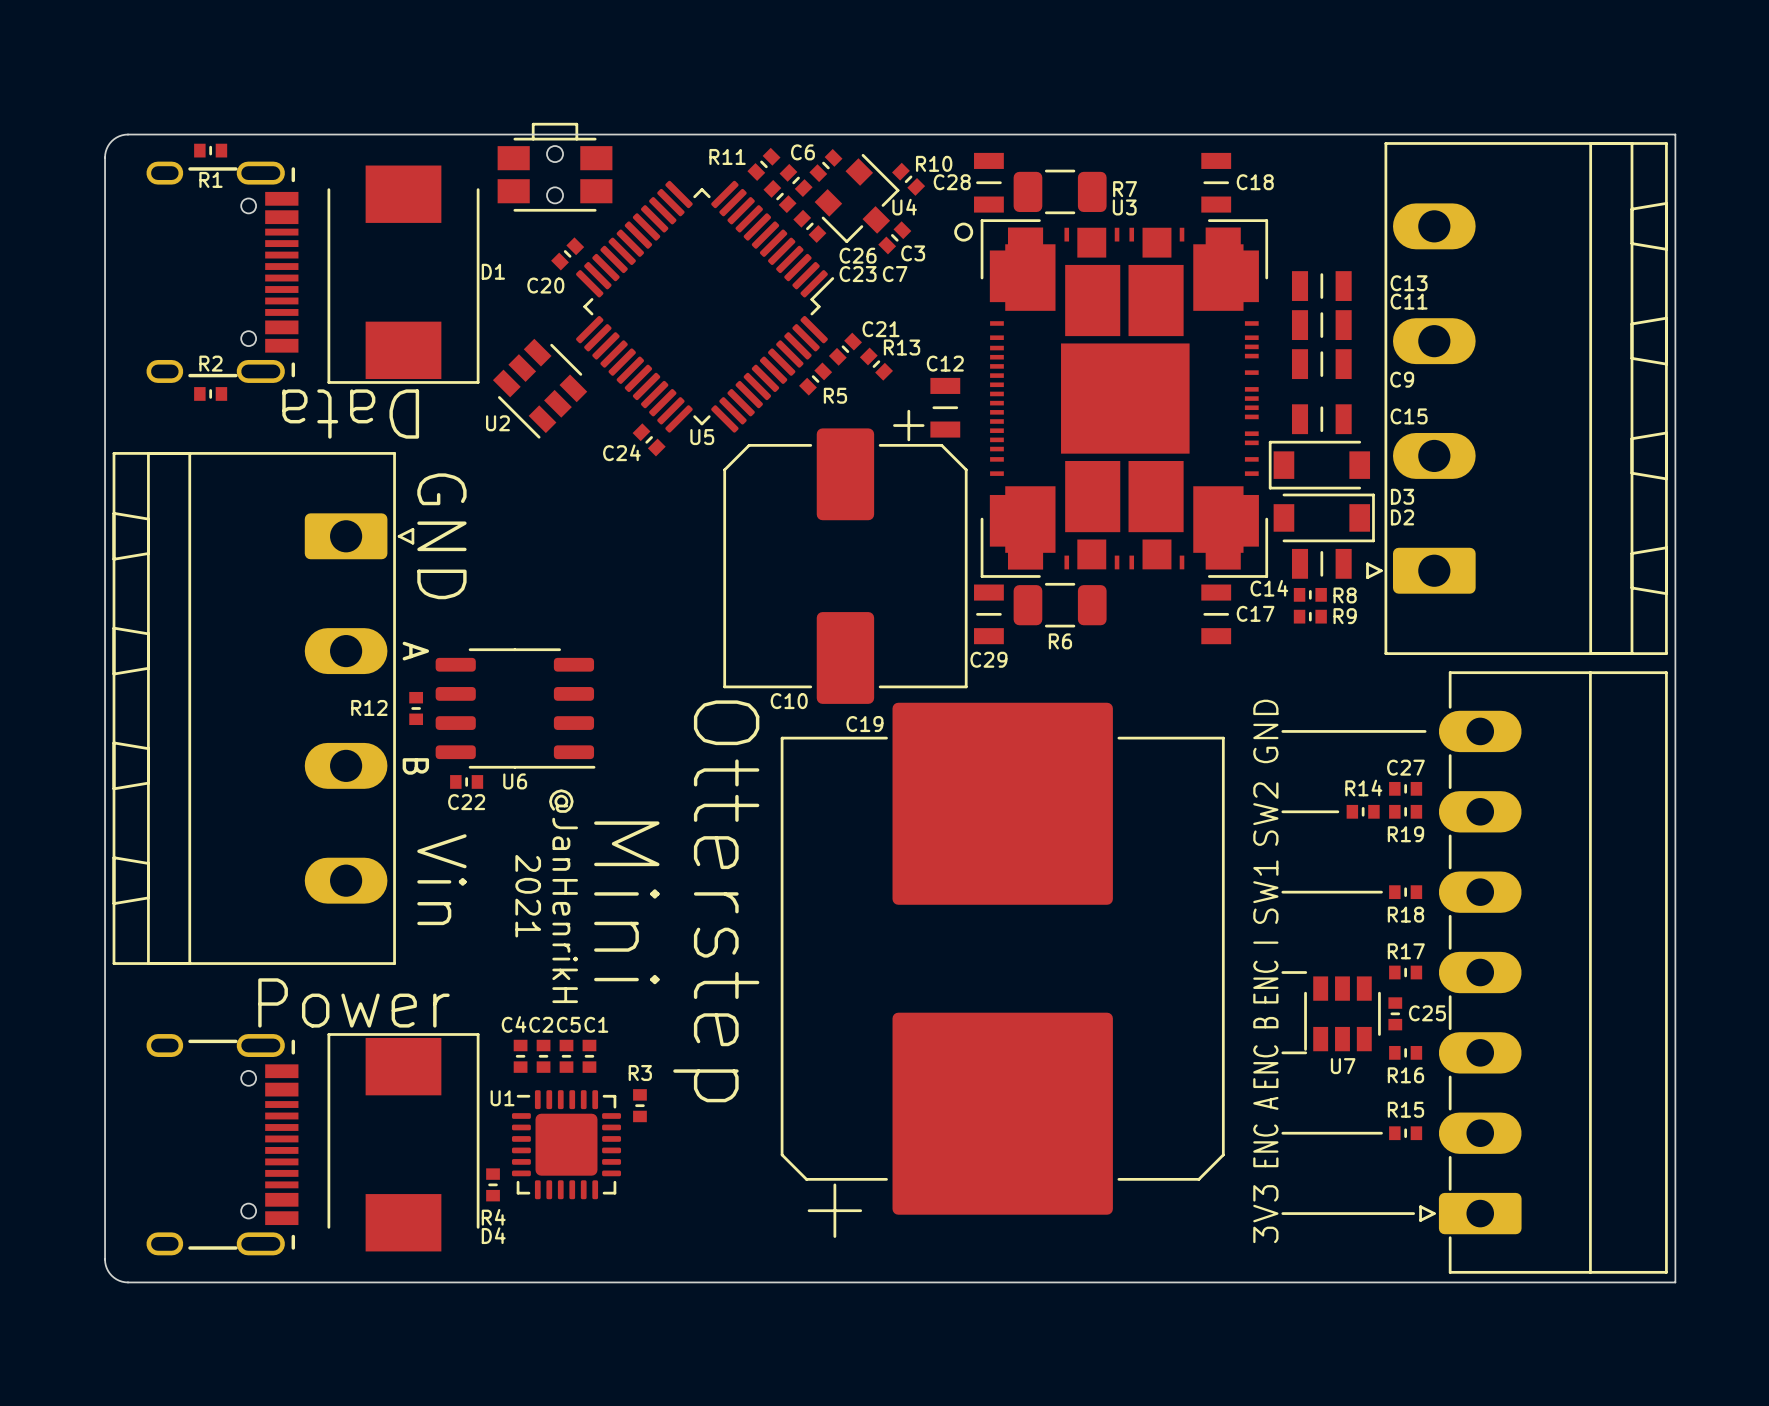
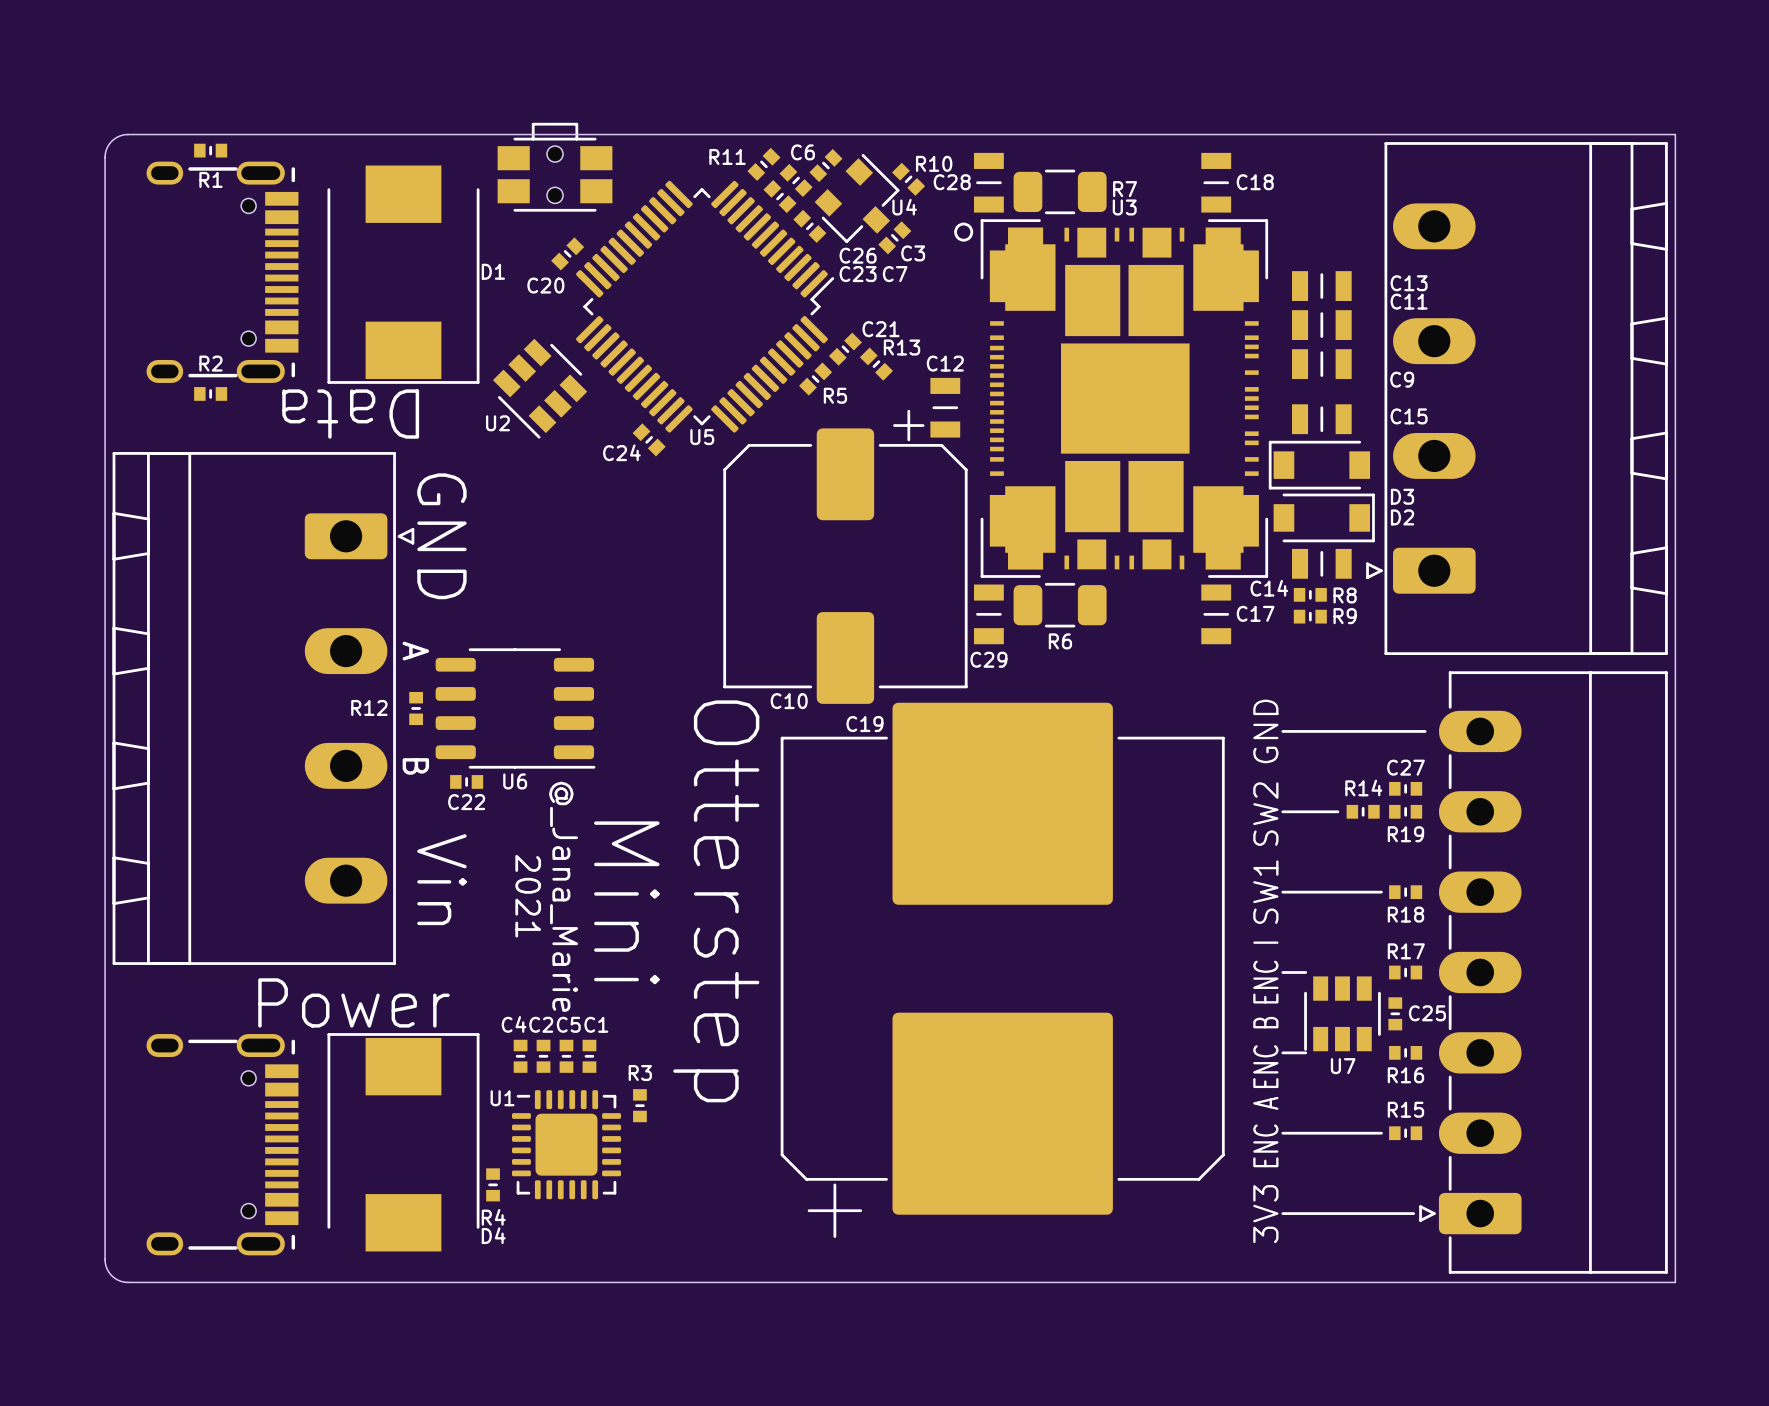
text: @JanHenrikH (563, 896) -> @_Jana_Marie (563, 896)

